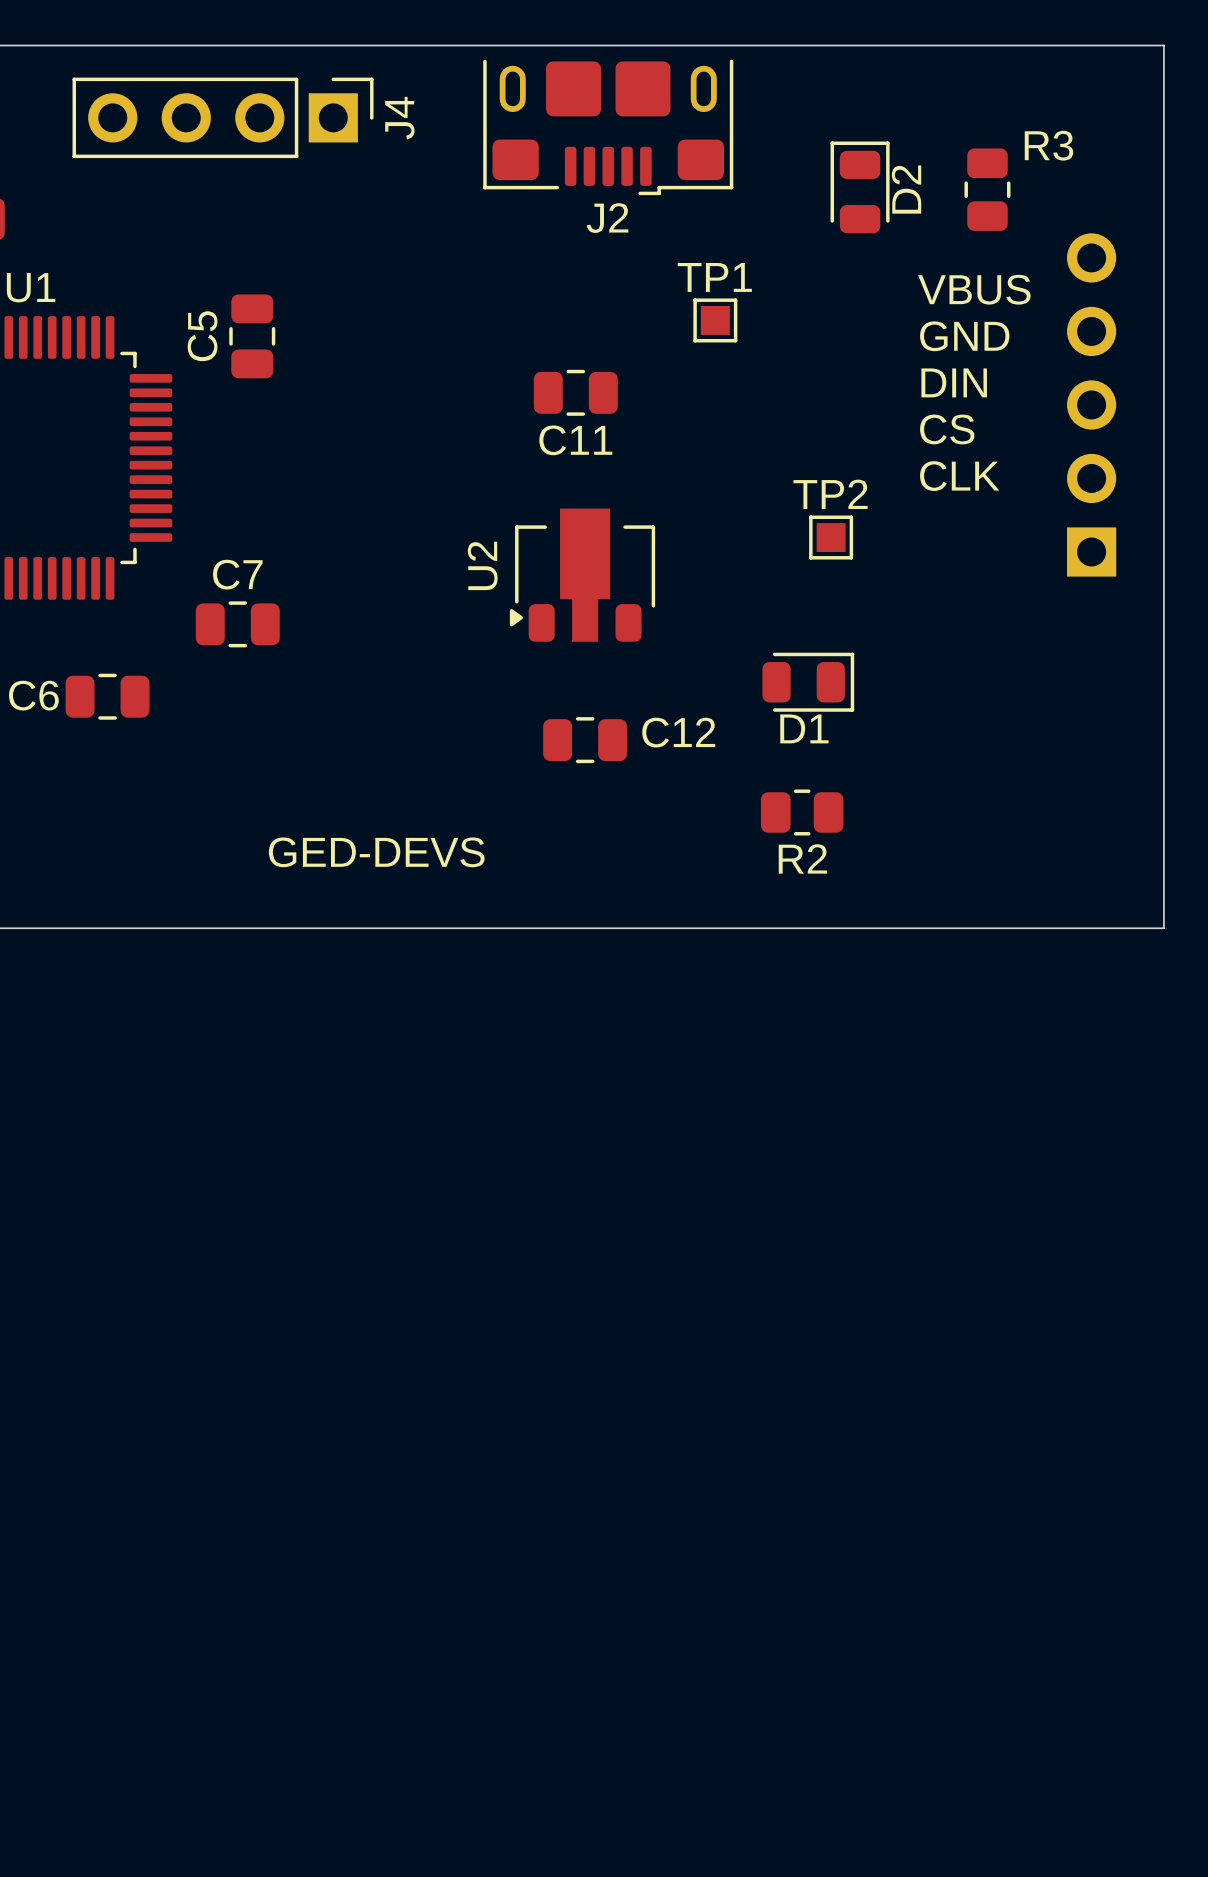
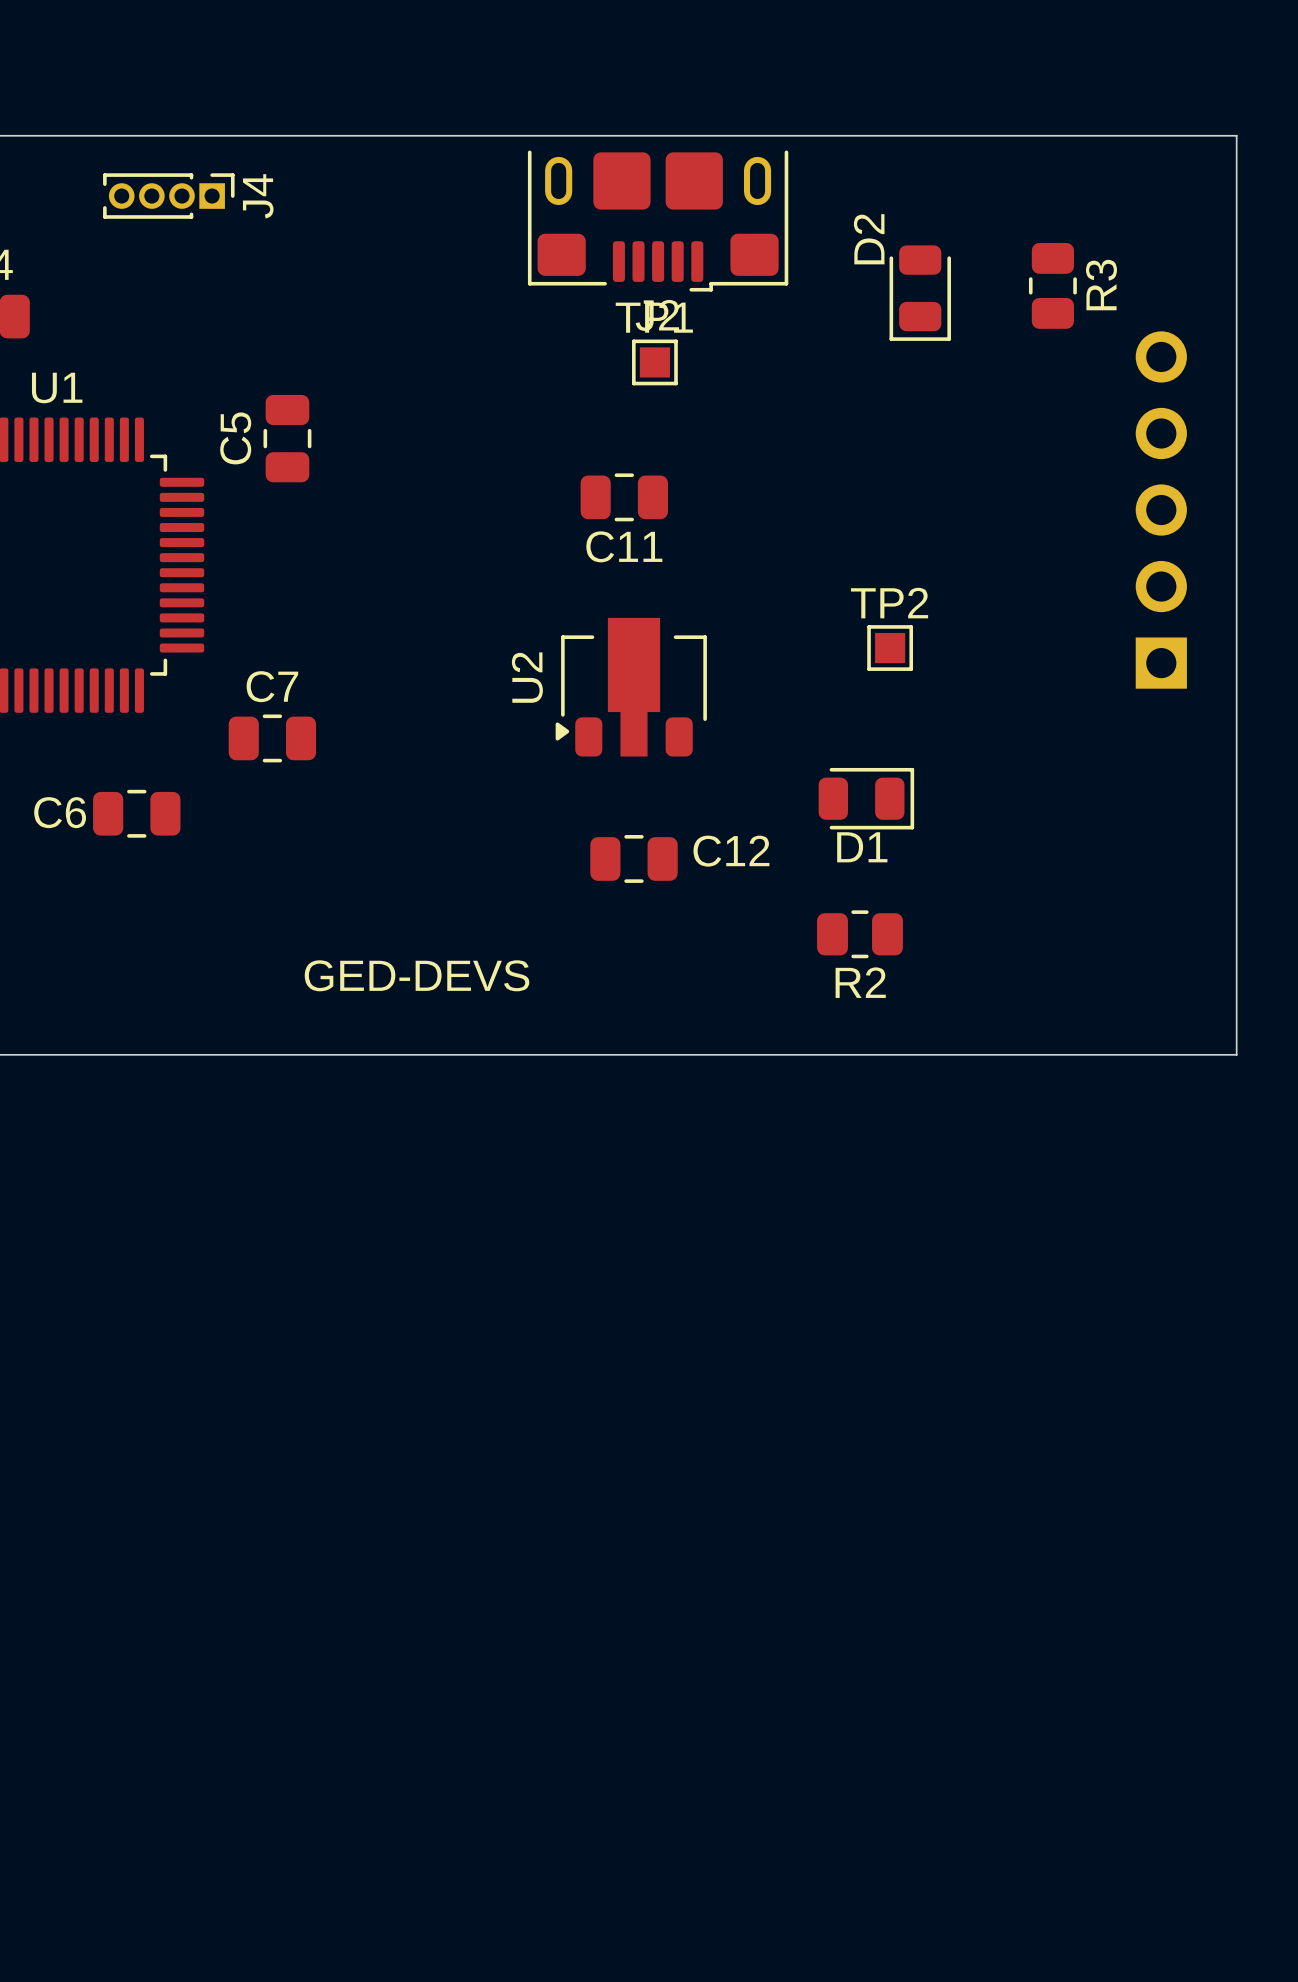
J4 footprint: [72, 77, 374, 159] -> [103, 173, 235, 219]
J4 name position: J4 (399, 118) -> J4 (258, 196)
R3 name rotation: 0° (1048, 145) -> 90° counterclockwise (1101, 285)
D2 rotation: 0° (860, 187) -> 180° (920, 293)
text: VBUS (974, 289) -> none
TP1 position: (715, 320) -> (654, 362)
text: GND (964, 336) -> none
text: DIN (954, 382) -> none
text: CS (947, 429) -> none
text: CLK (959, 476) -> none

